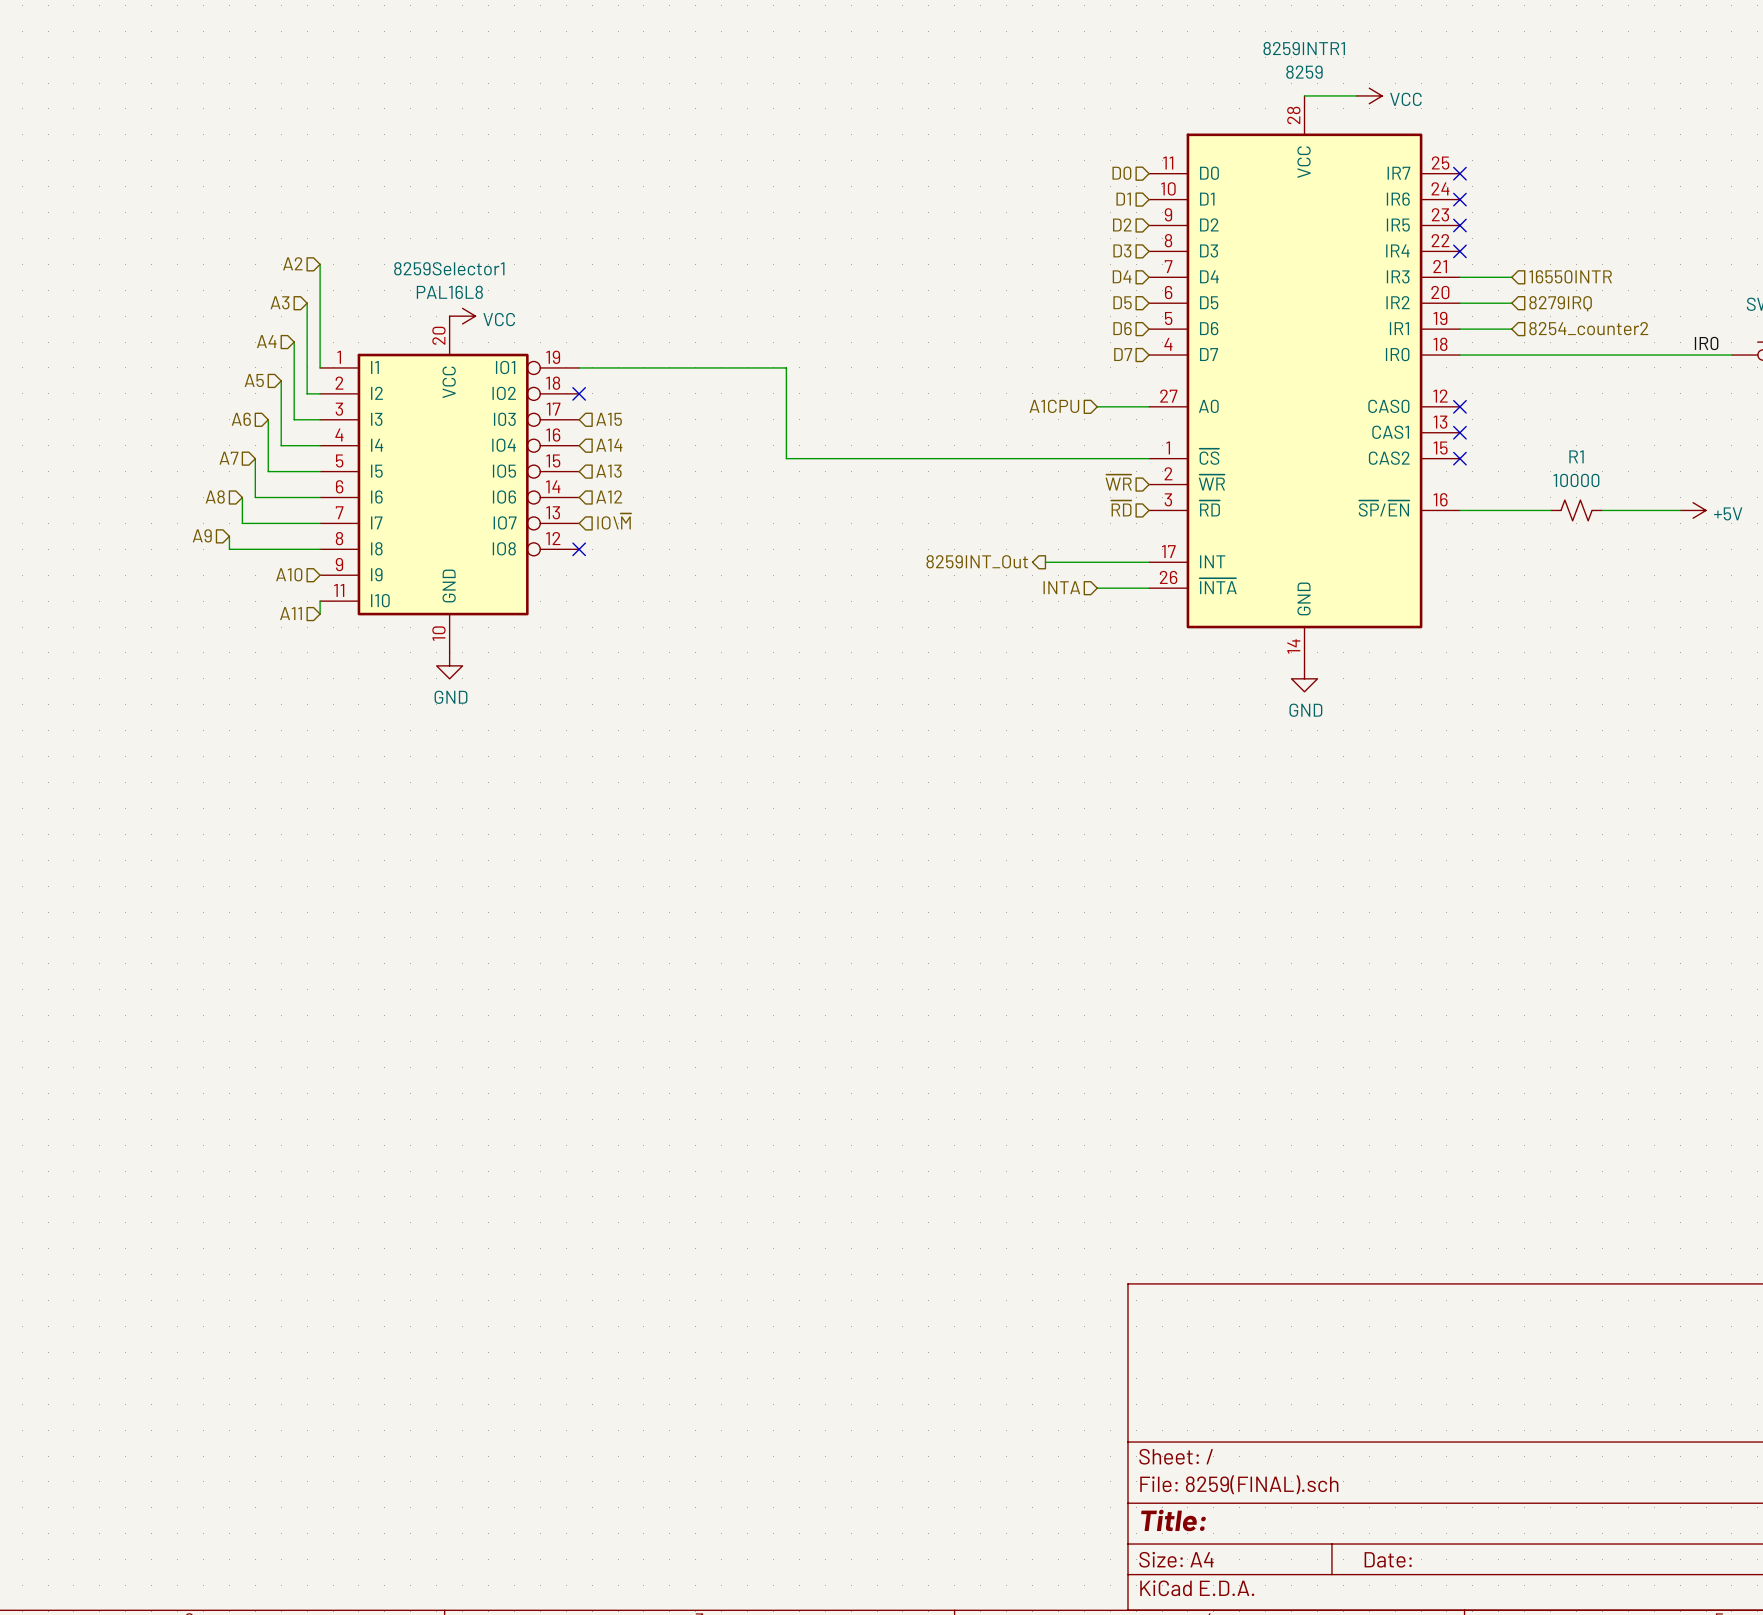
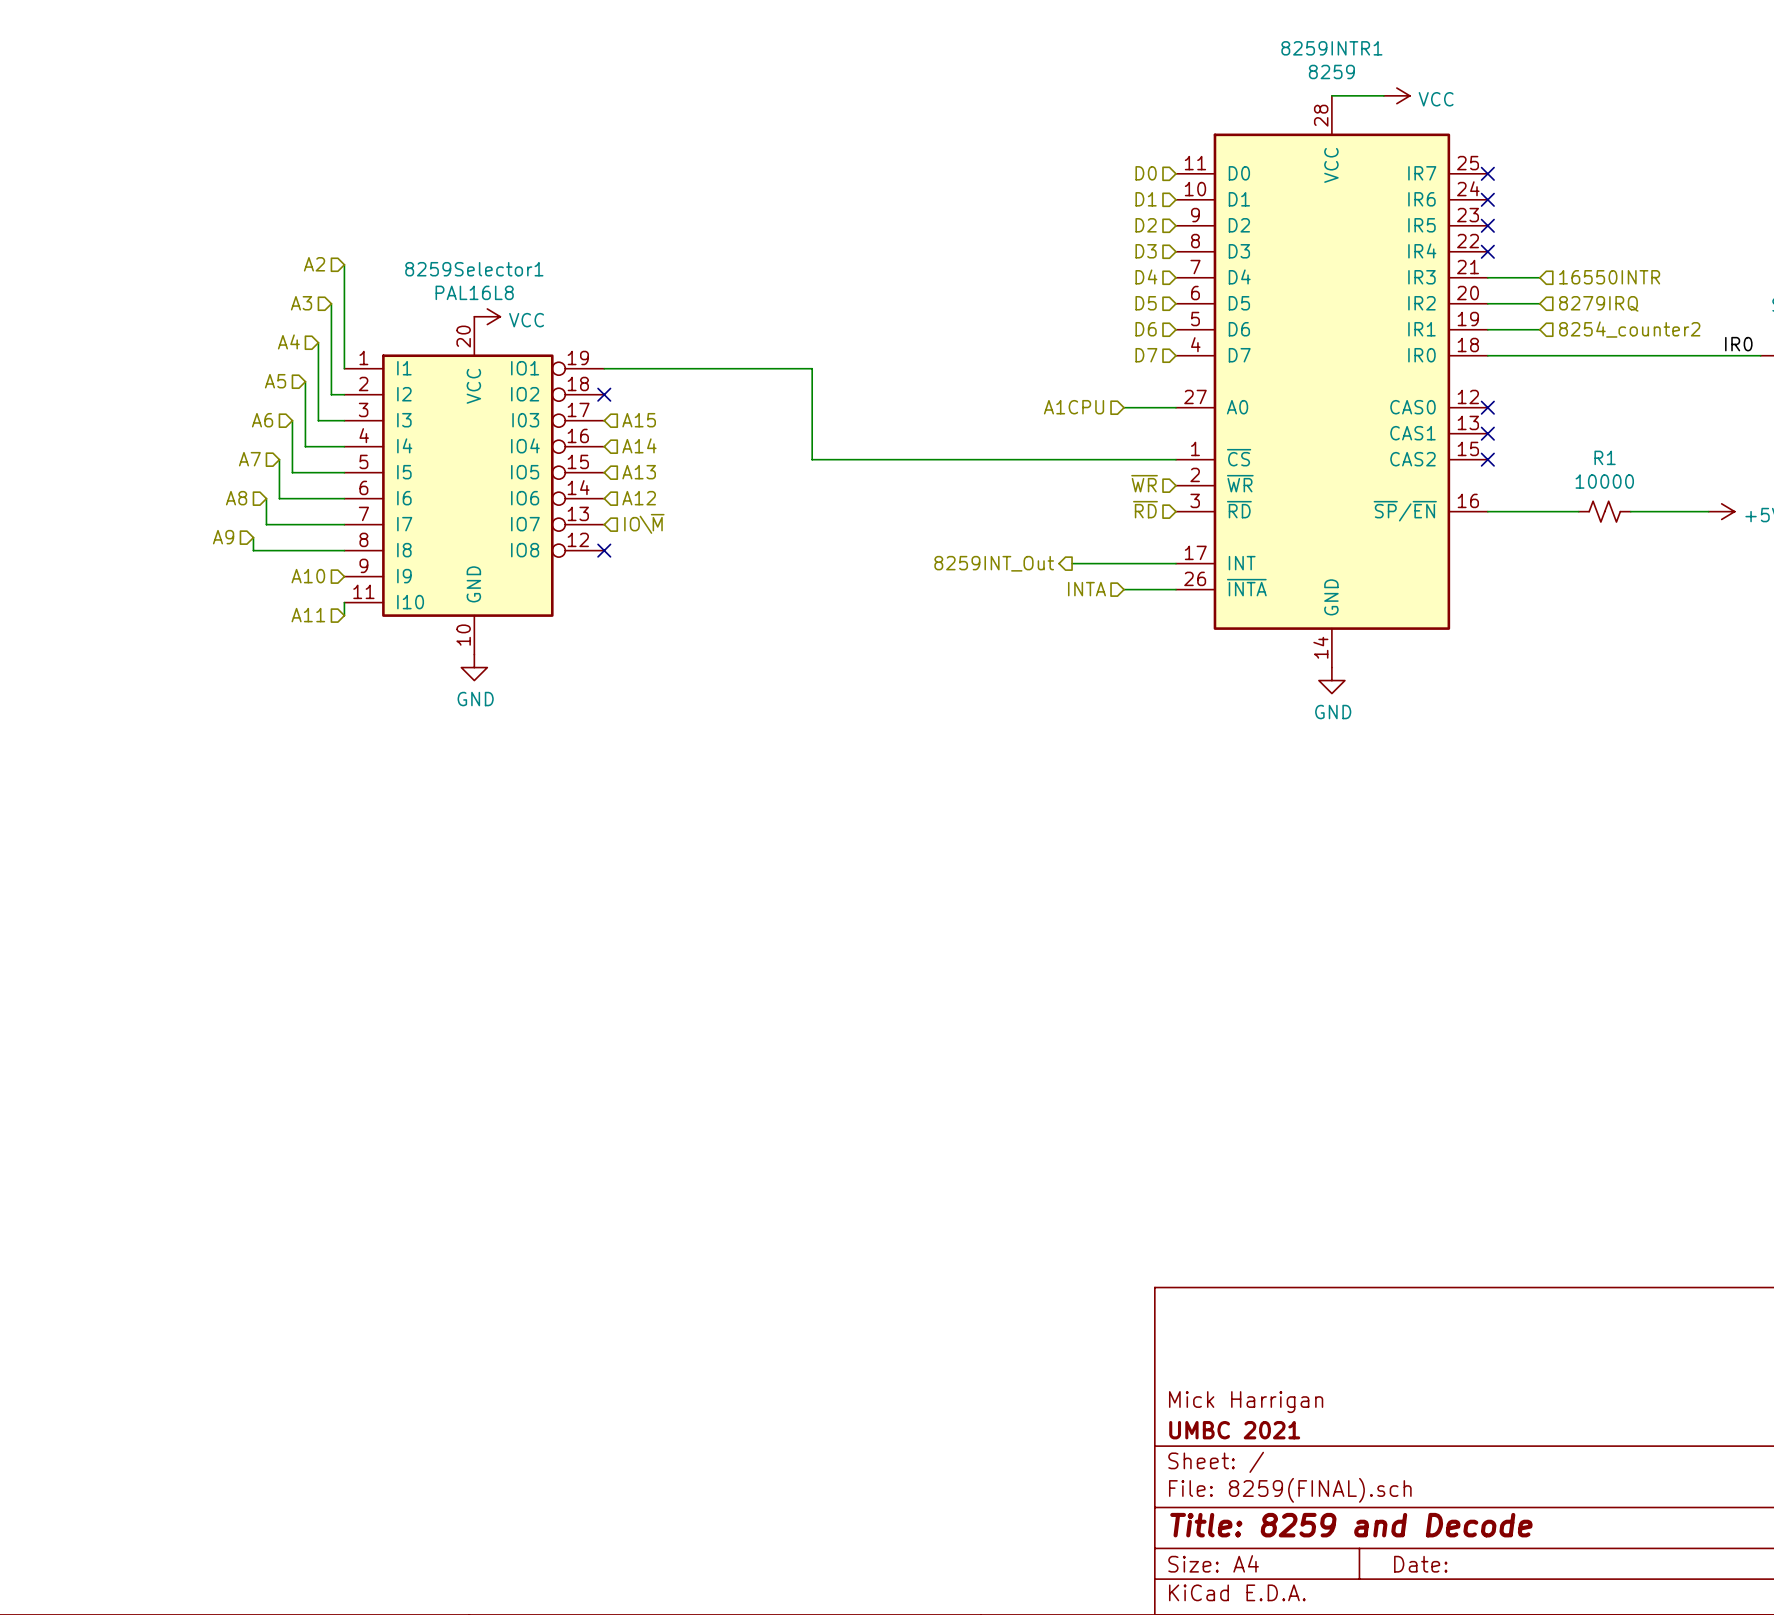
title block: none -> Mick Harrigan (1246, 1402)
title block: none -> UMBC 2021 (1234, 1430)
title block: Title: (1173, 1520) -> Title: 8259 and Decode (1351, 1525)

